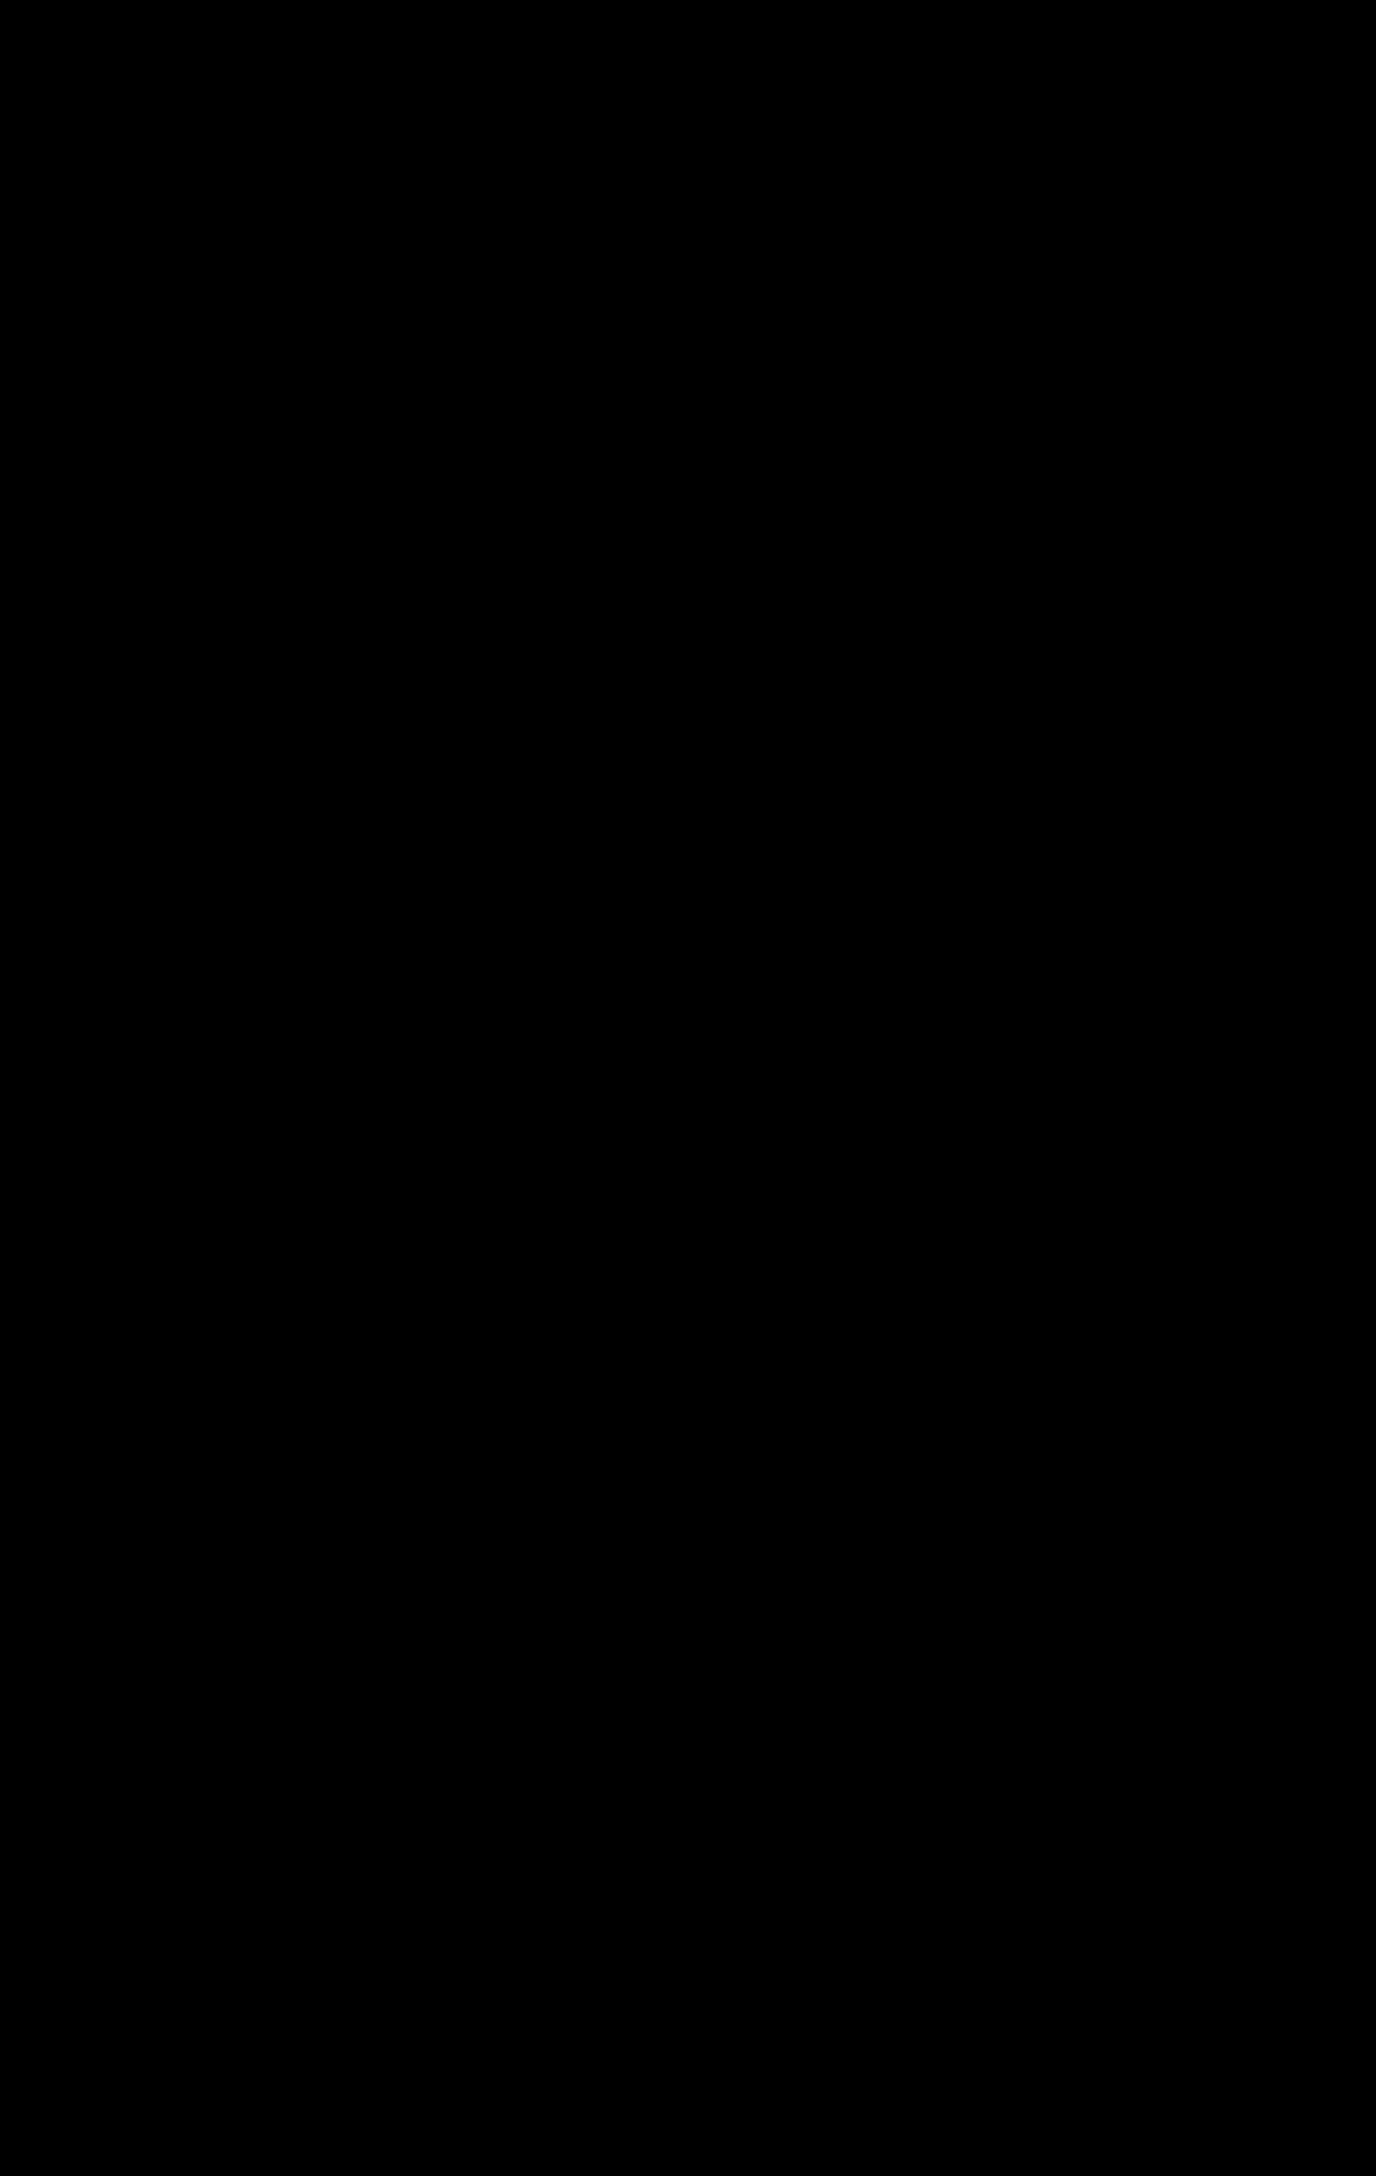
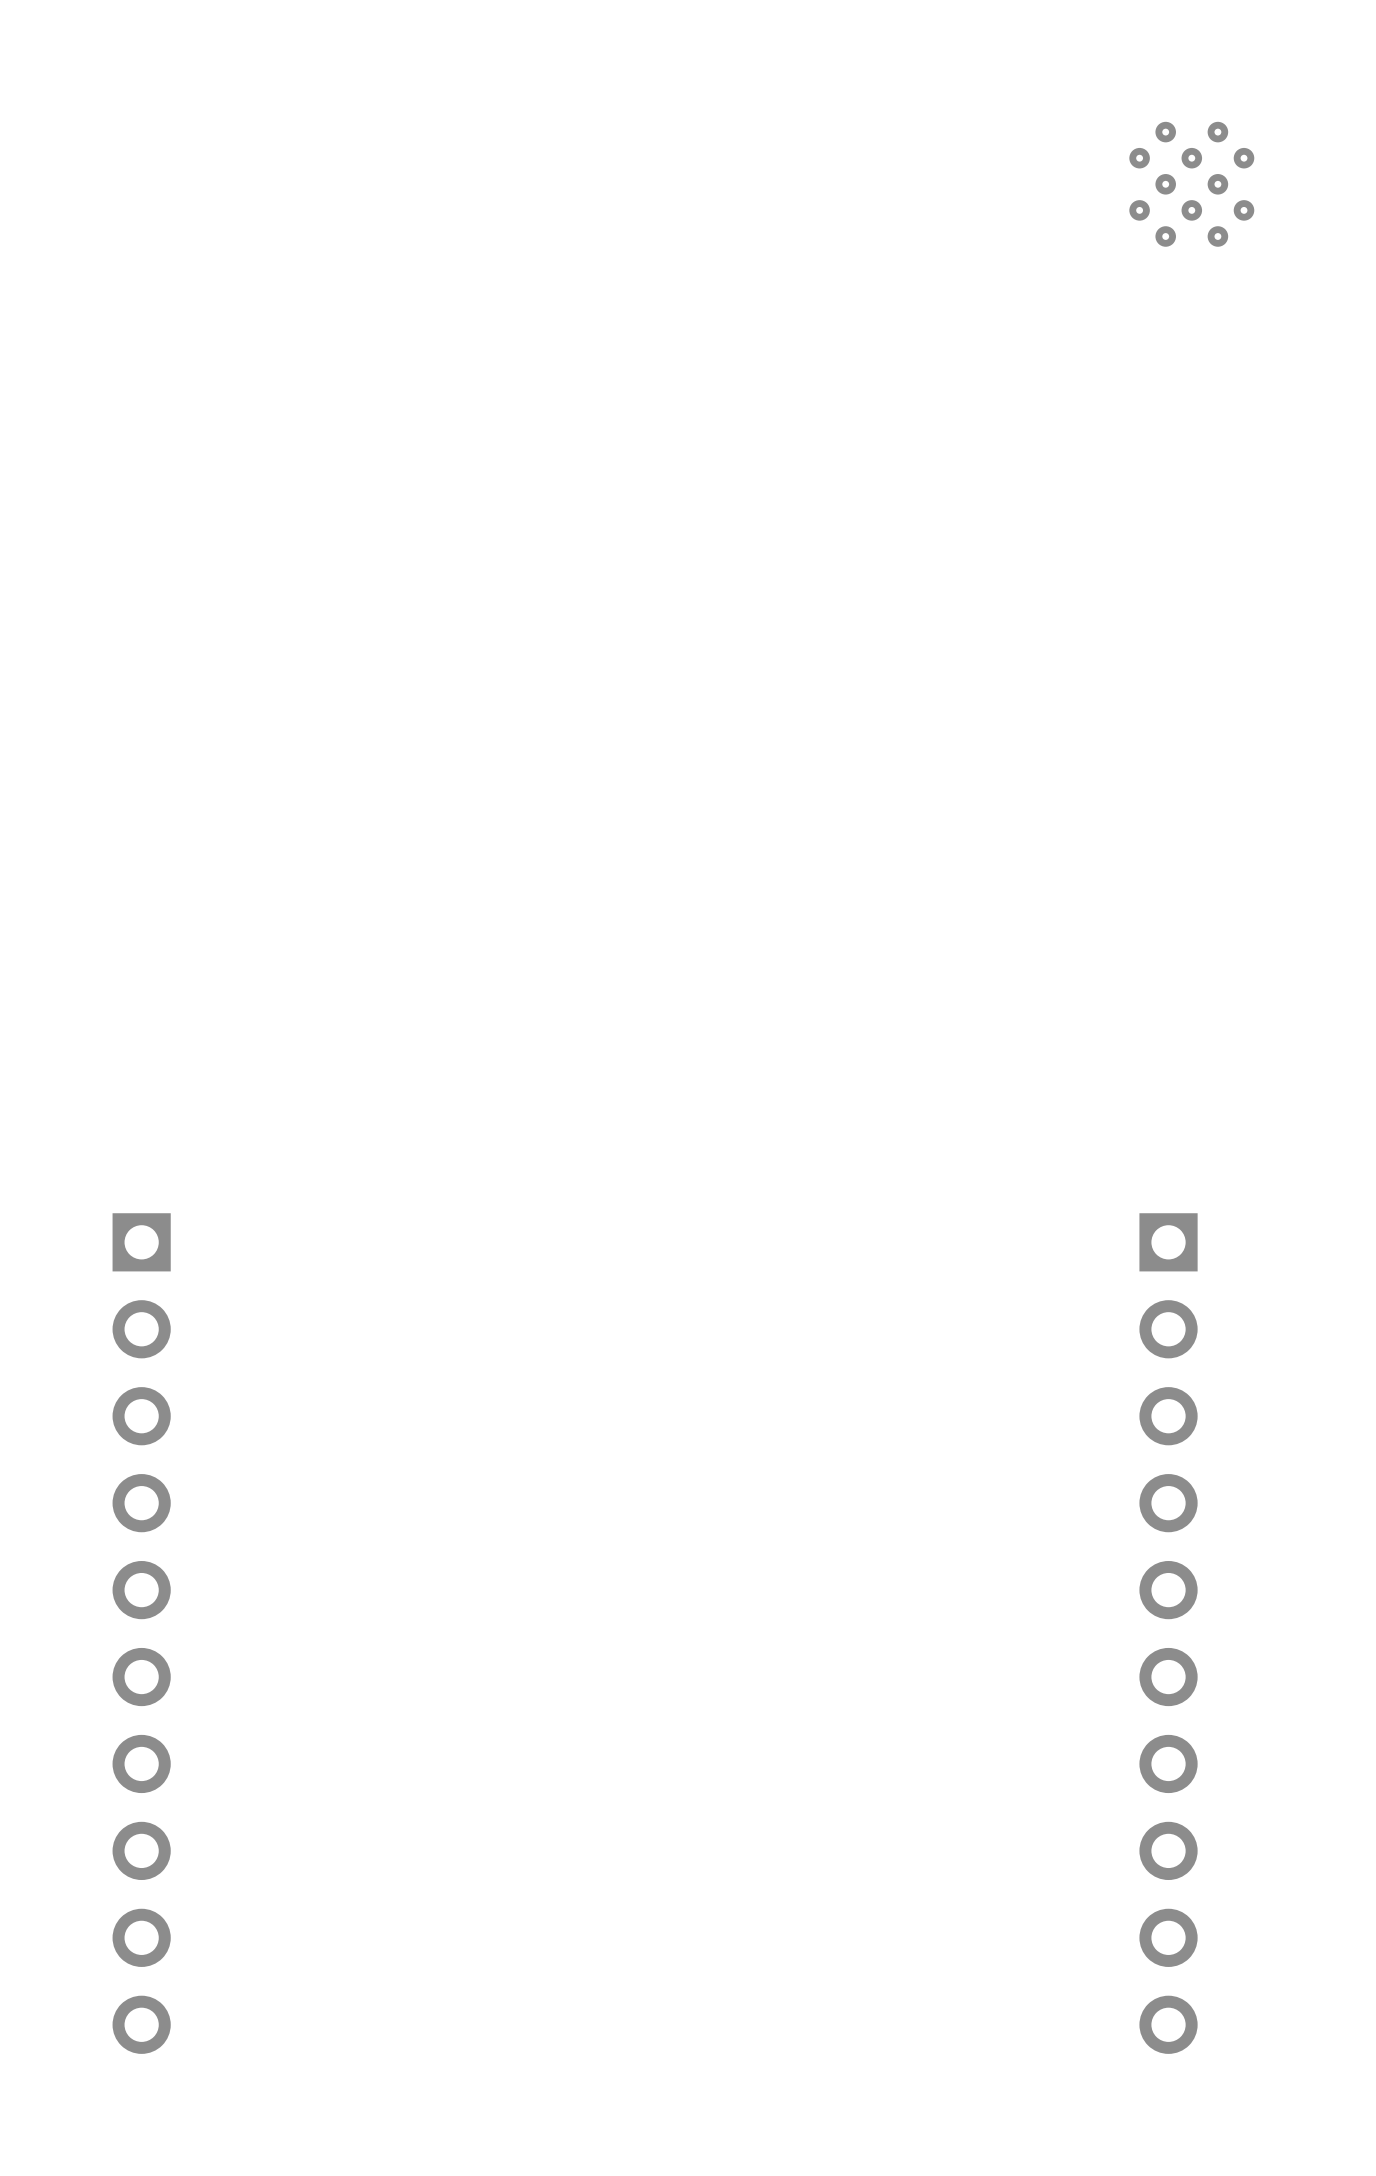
part: none -> (1191, 184)
part: none -> (141, 1633)
part: none -> (1168, 1633)

